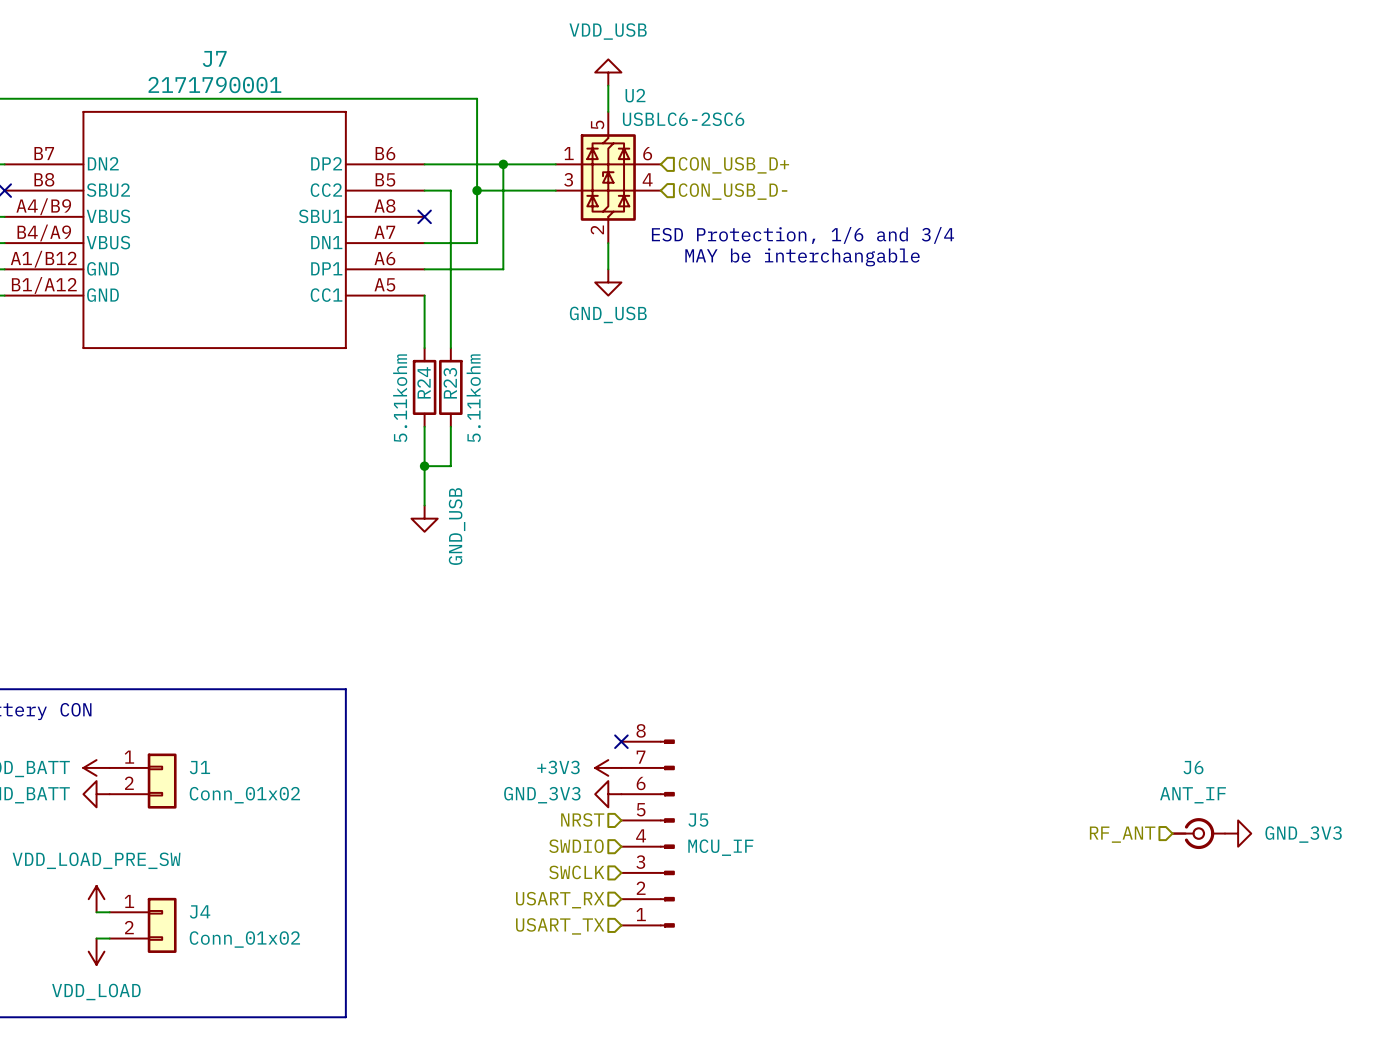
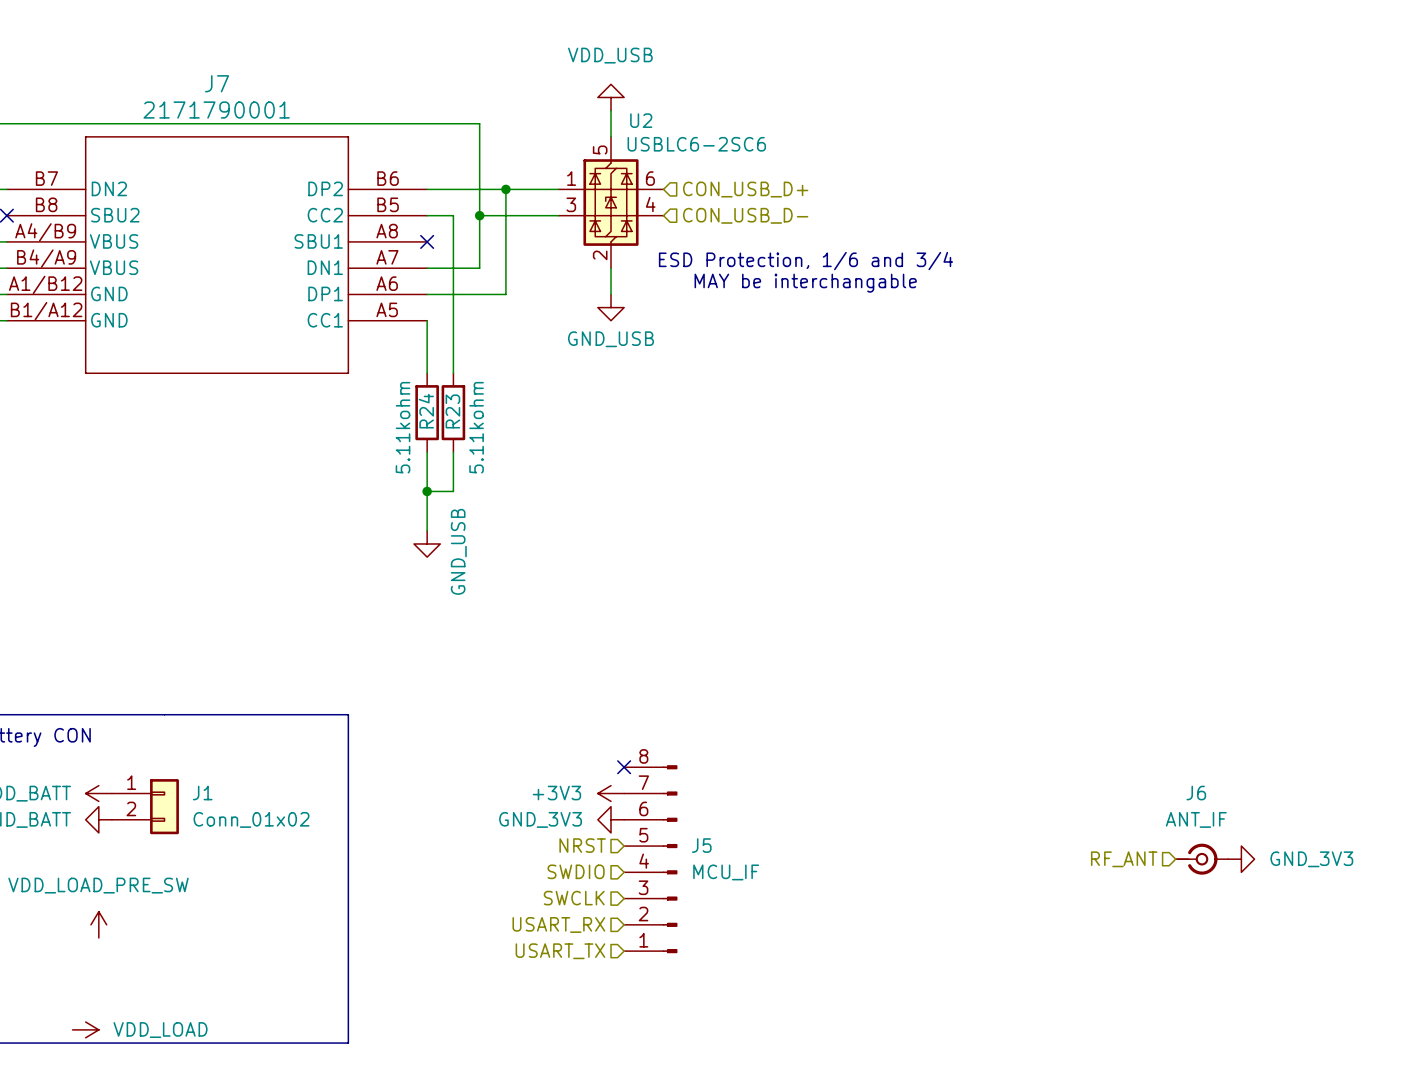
wire: (96, 912) (109, 912) -> none
J4: Conn_01x02 (143, 925) -> none
wire: (96, 938) (109, 938) -> none
power symbol rotation: 0° (96, 951) -> 90° counterclockwise (85, 1029)
power symbol position: VDD_LOAD (96, 951) -> VDD_LOAD (85, 1029)
power symbol text position: VDD_LOAD (96, 992) -> VDD_LOAD (160, 1030)

